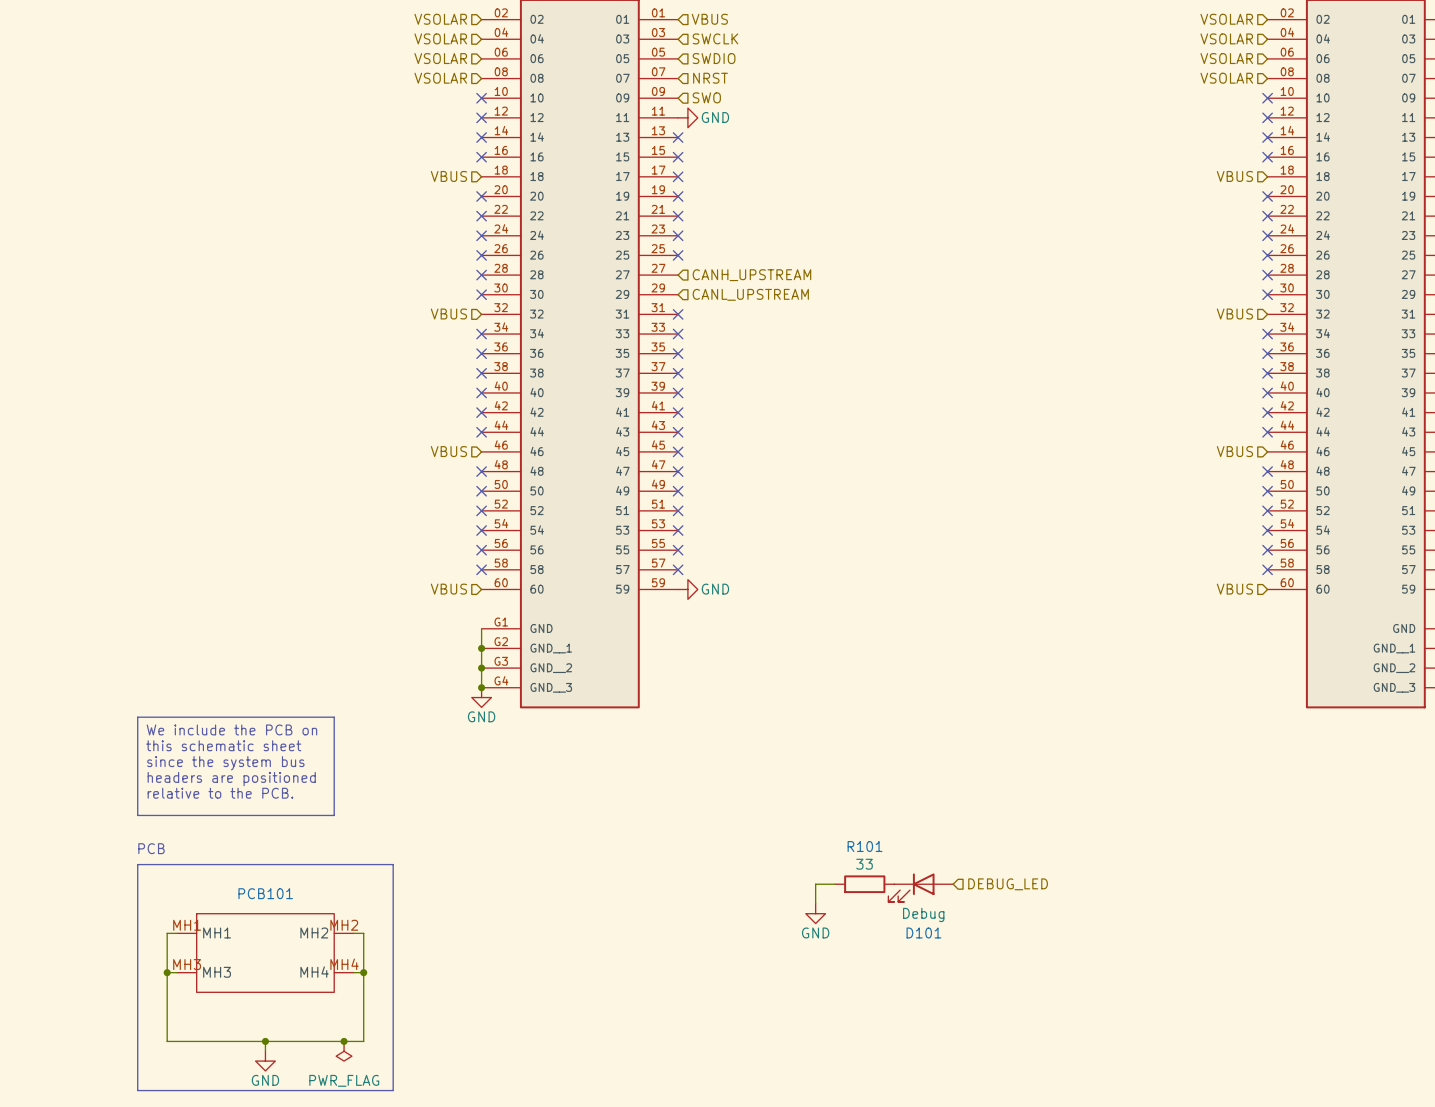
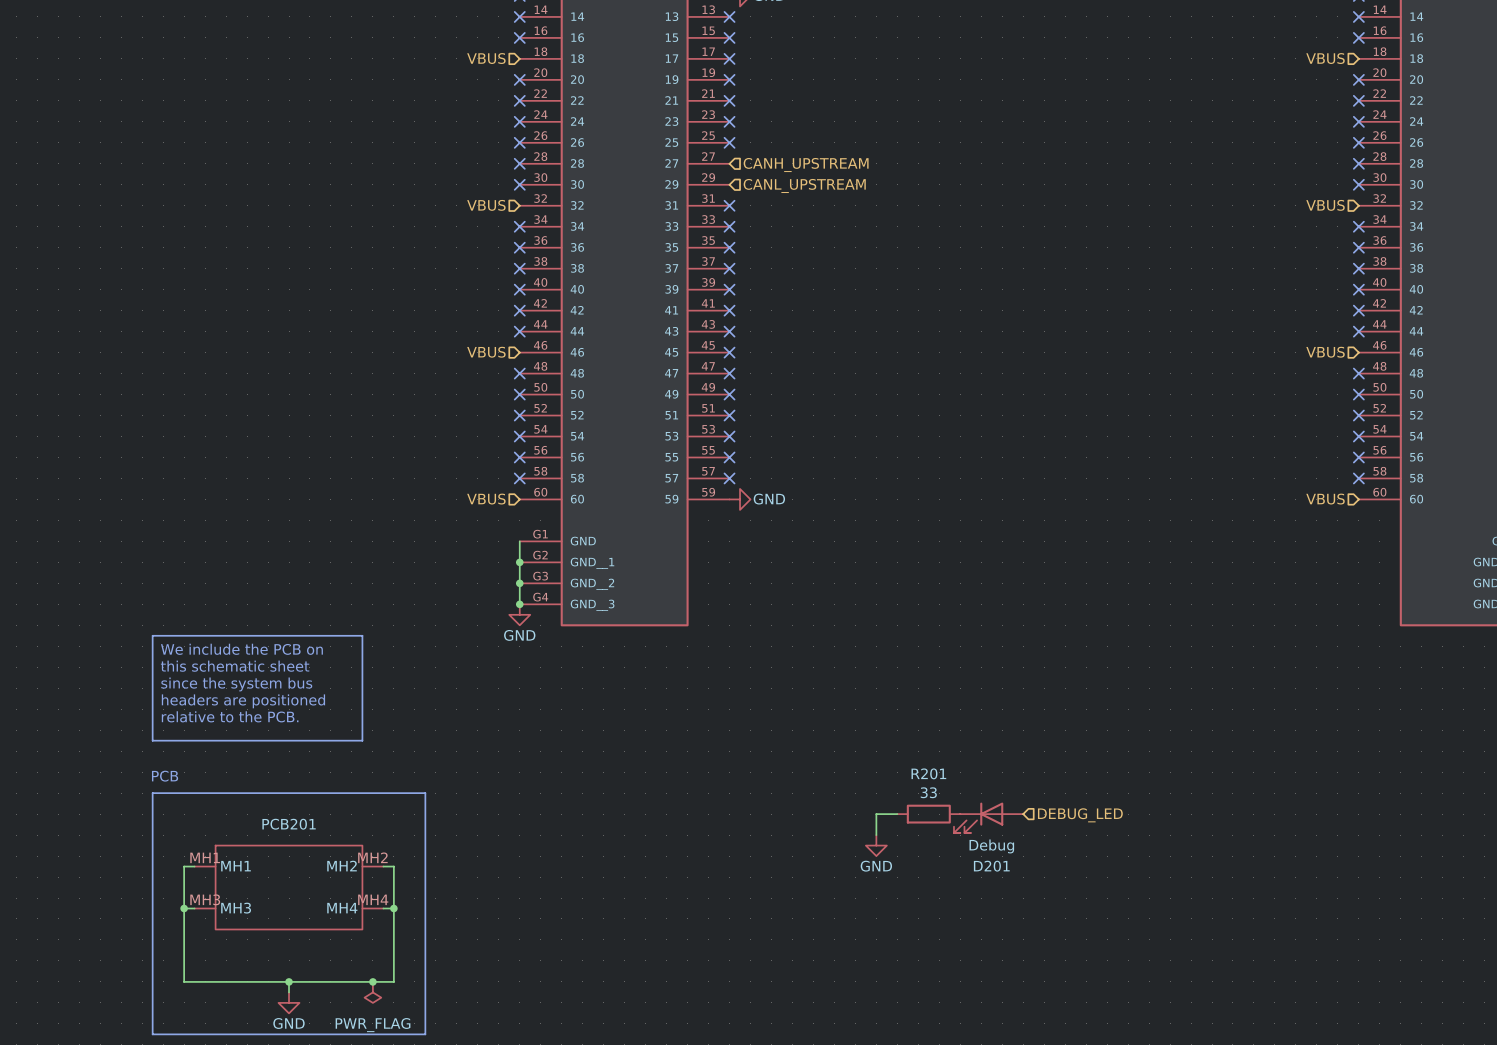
R101 name: R101 (865, 846) -> R201 (928, 773)
PCB101 name: PCB101 (265, 893) -> PCB201 (289, 824)
D101 name: D101 (923, 932) -> D201 (991, 866)

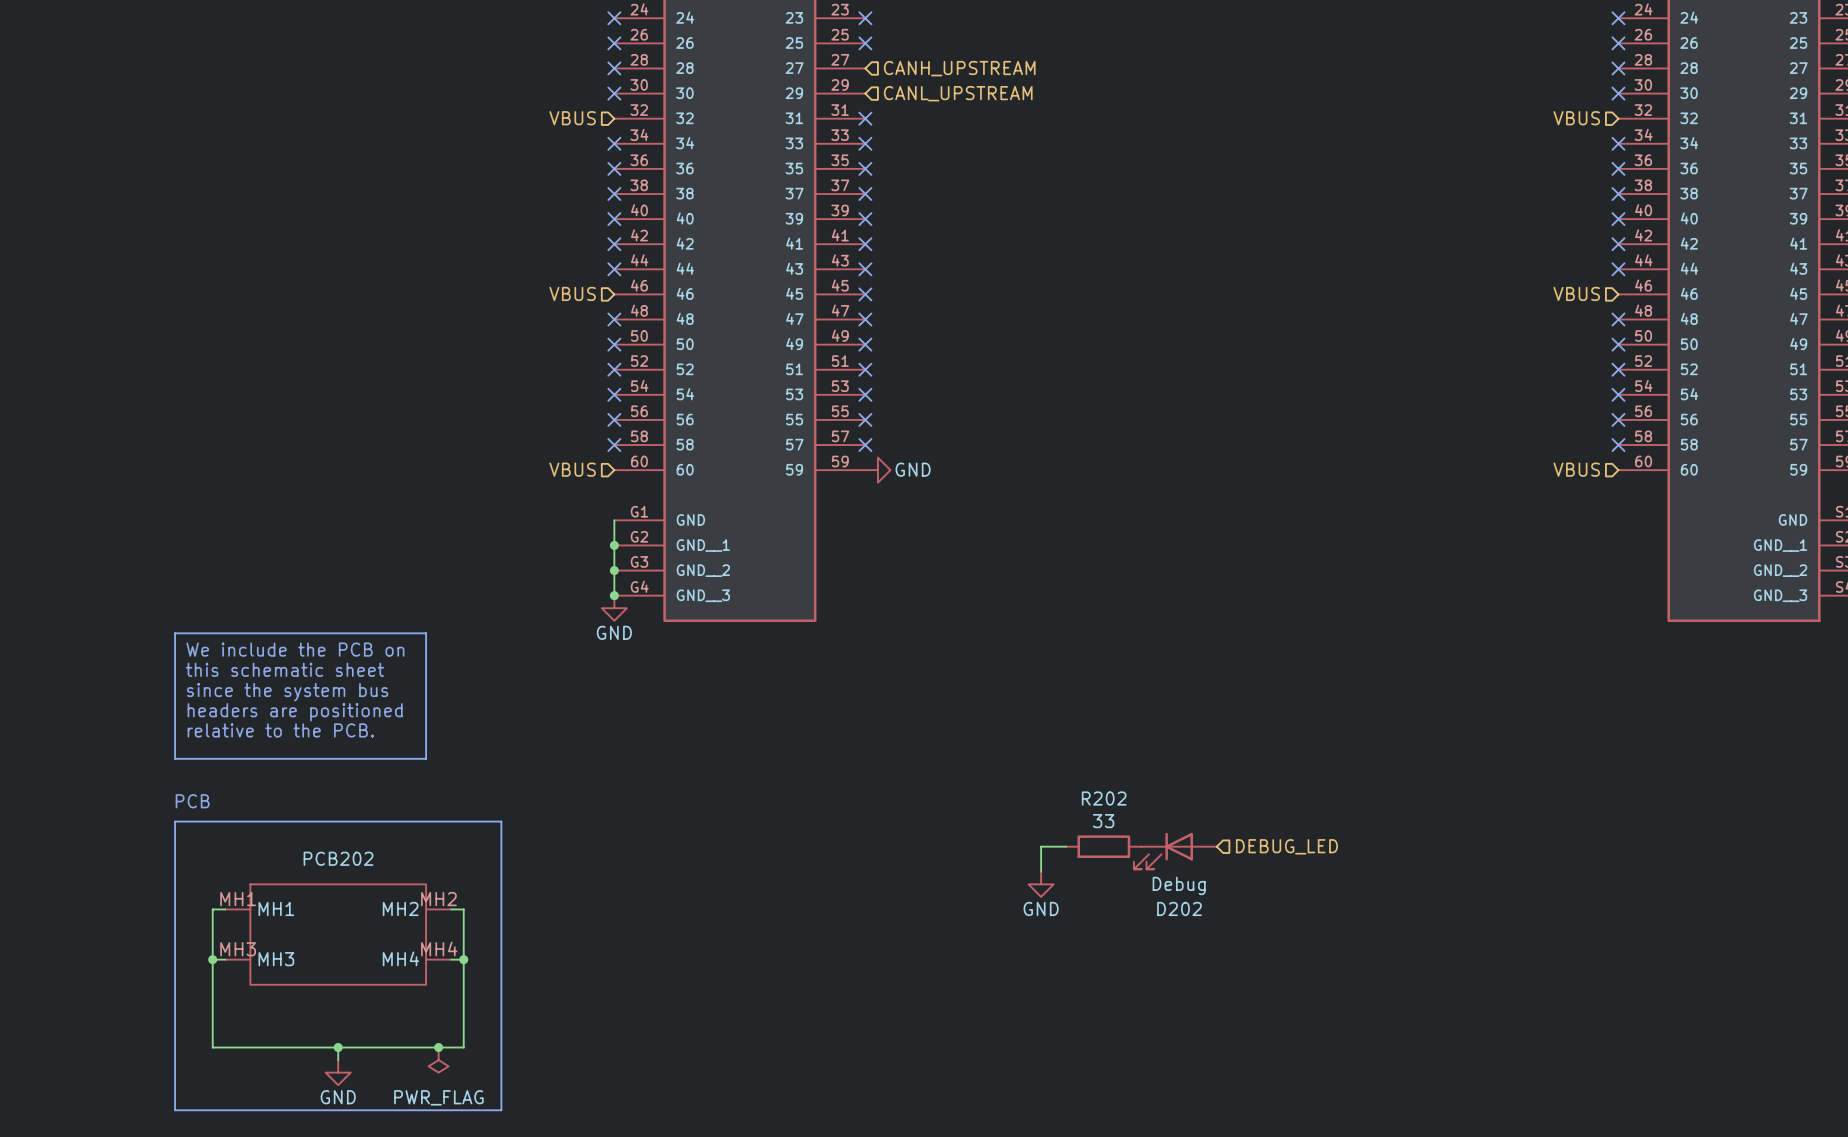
R201 name: R201 (928, 773) -> R202 (1104, 798)
PCB201 name: PCB201 (289, 824) -> PCB202 (338, 858)
D201 name: D201 (991, 866) -> D202 (1179, 908)

